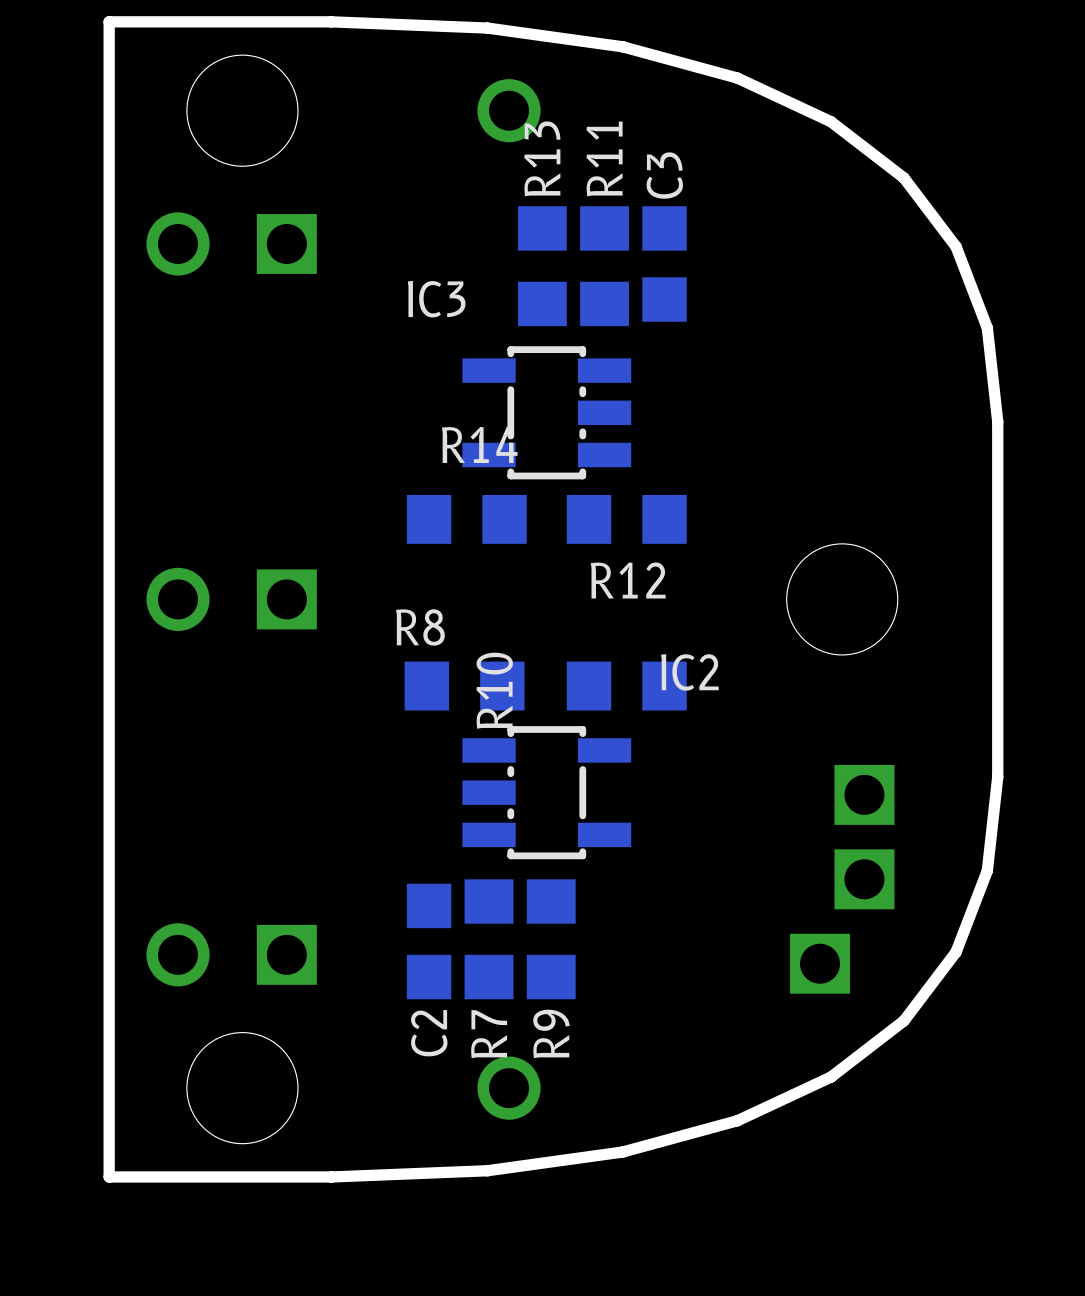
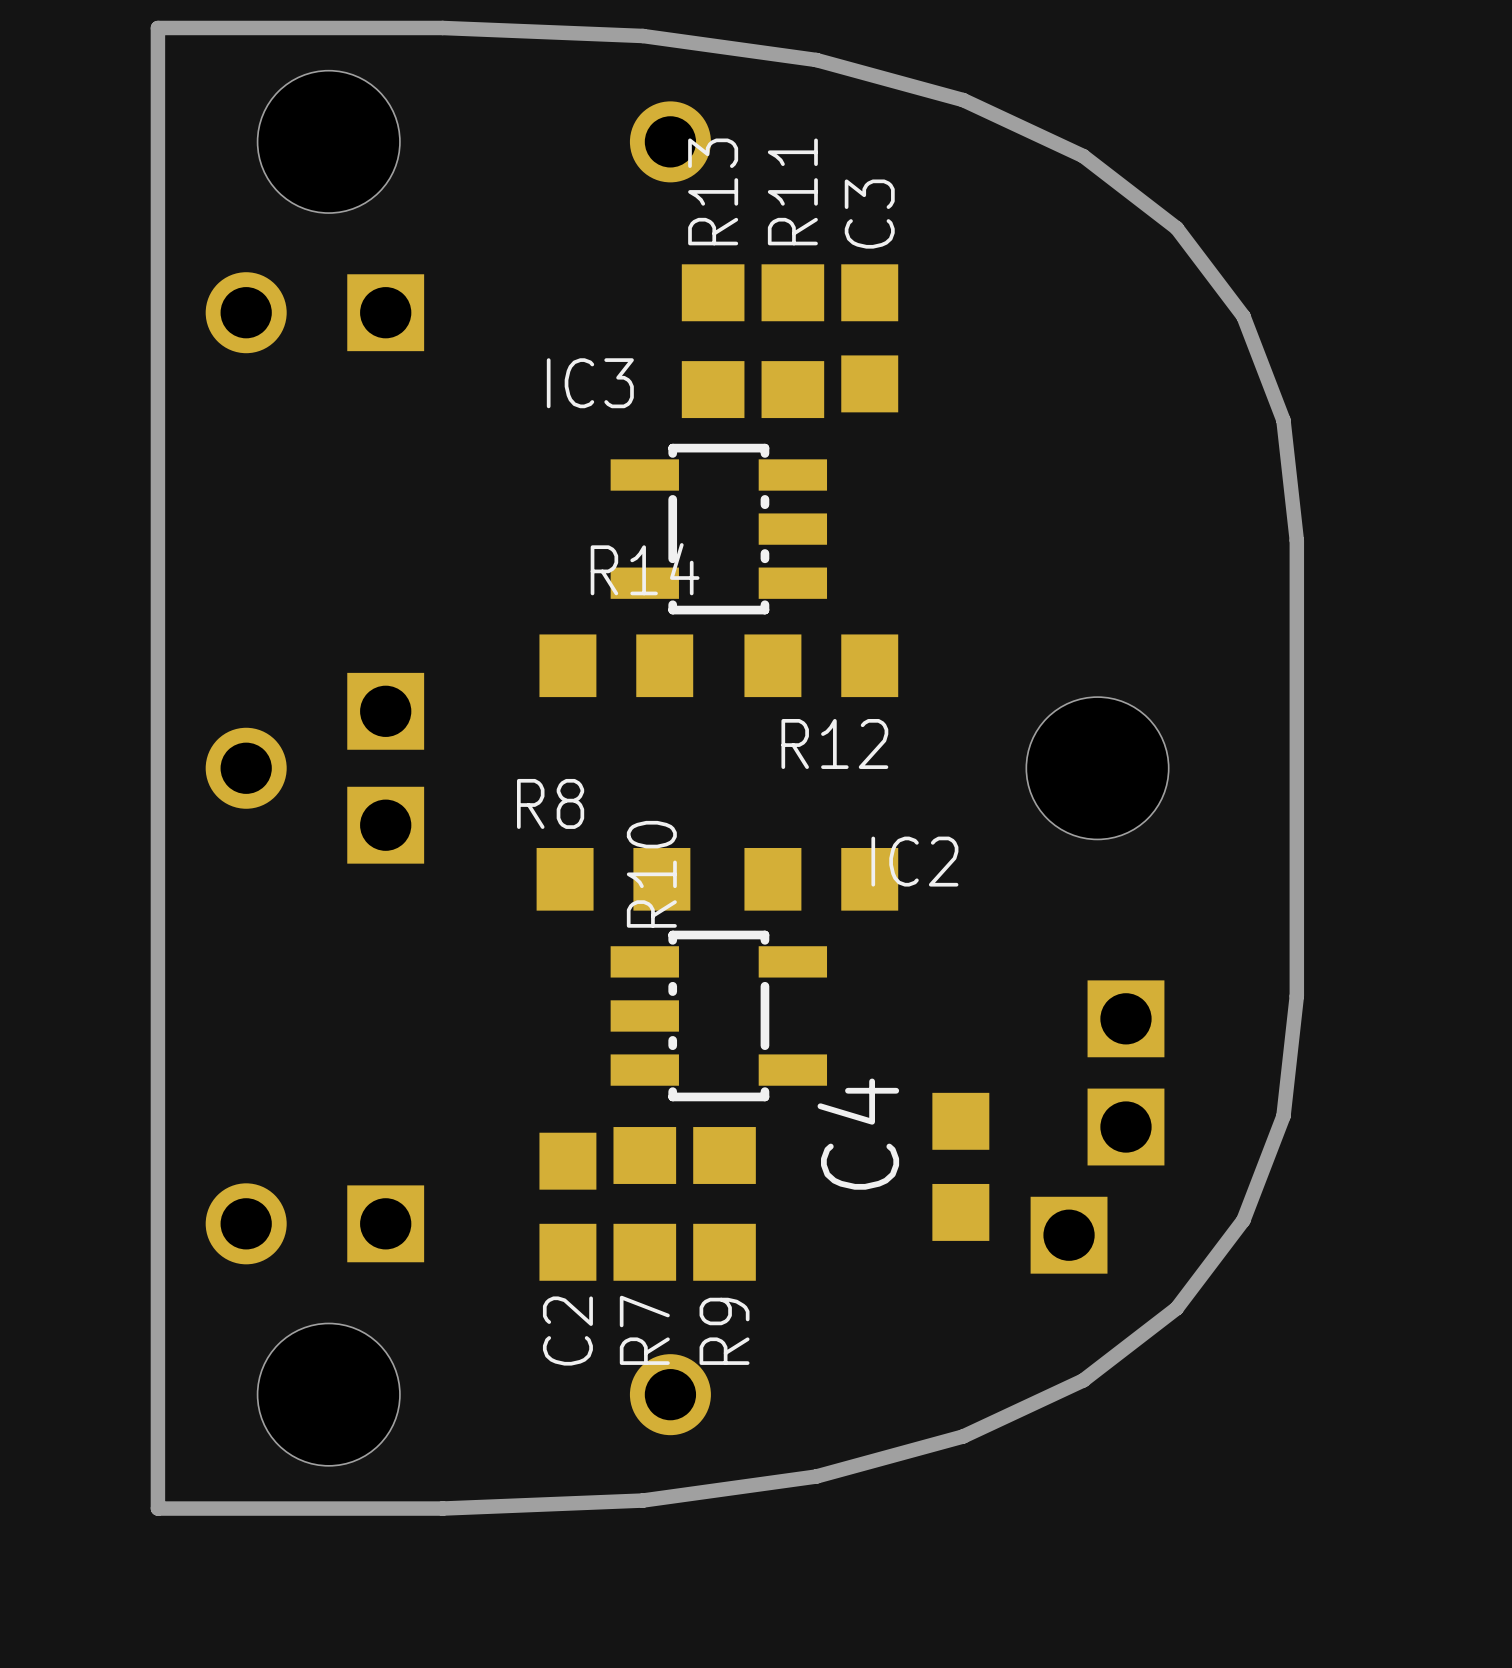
part: none -> (385, 711)
part: (286, 599) -> none
part: none -> (385, 825)
C4: none -> (960, 1166)

